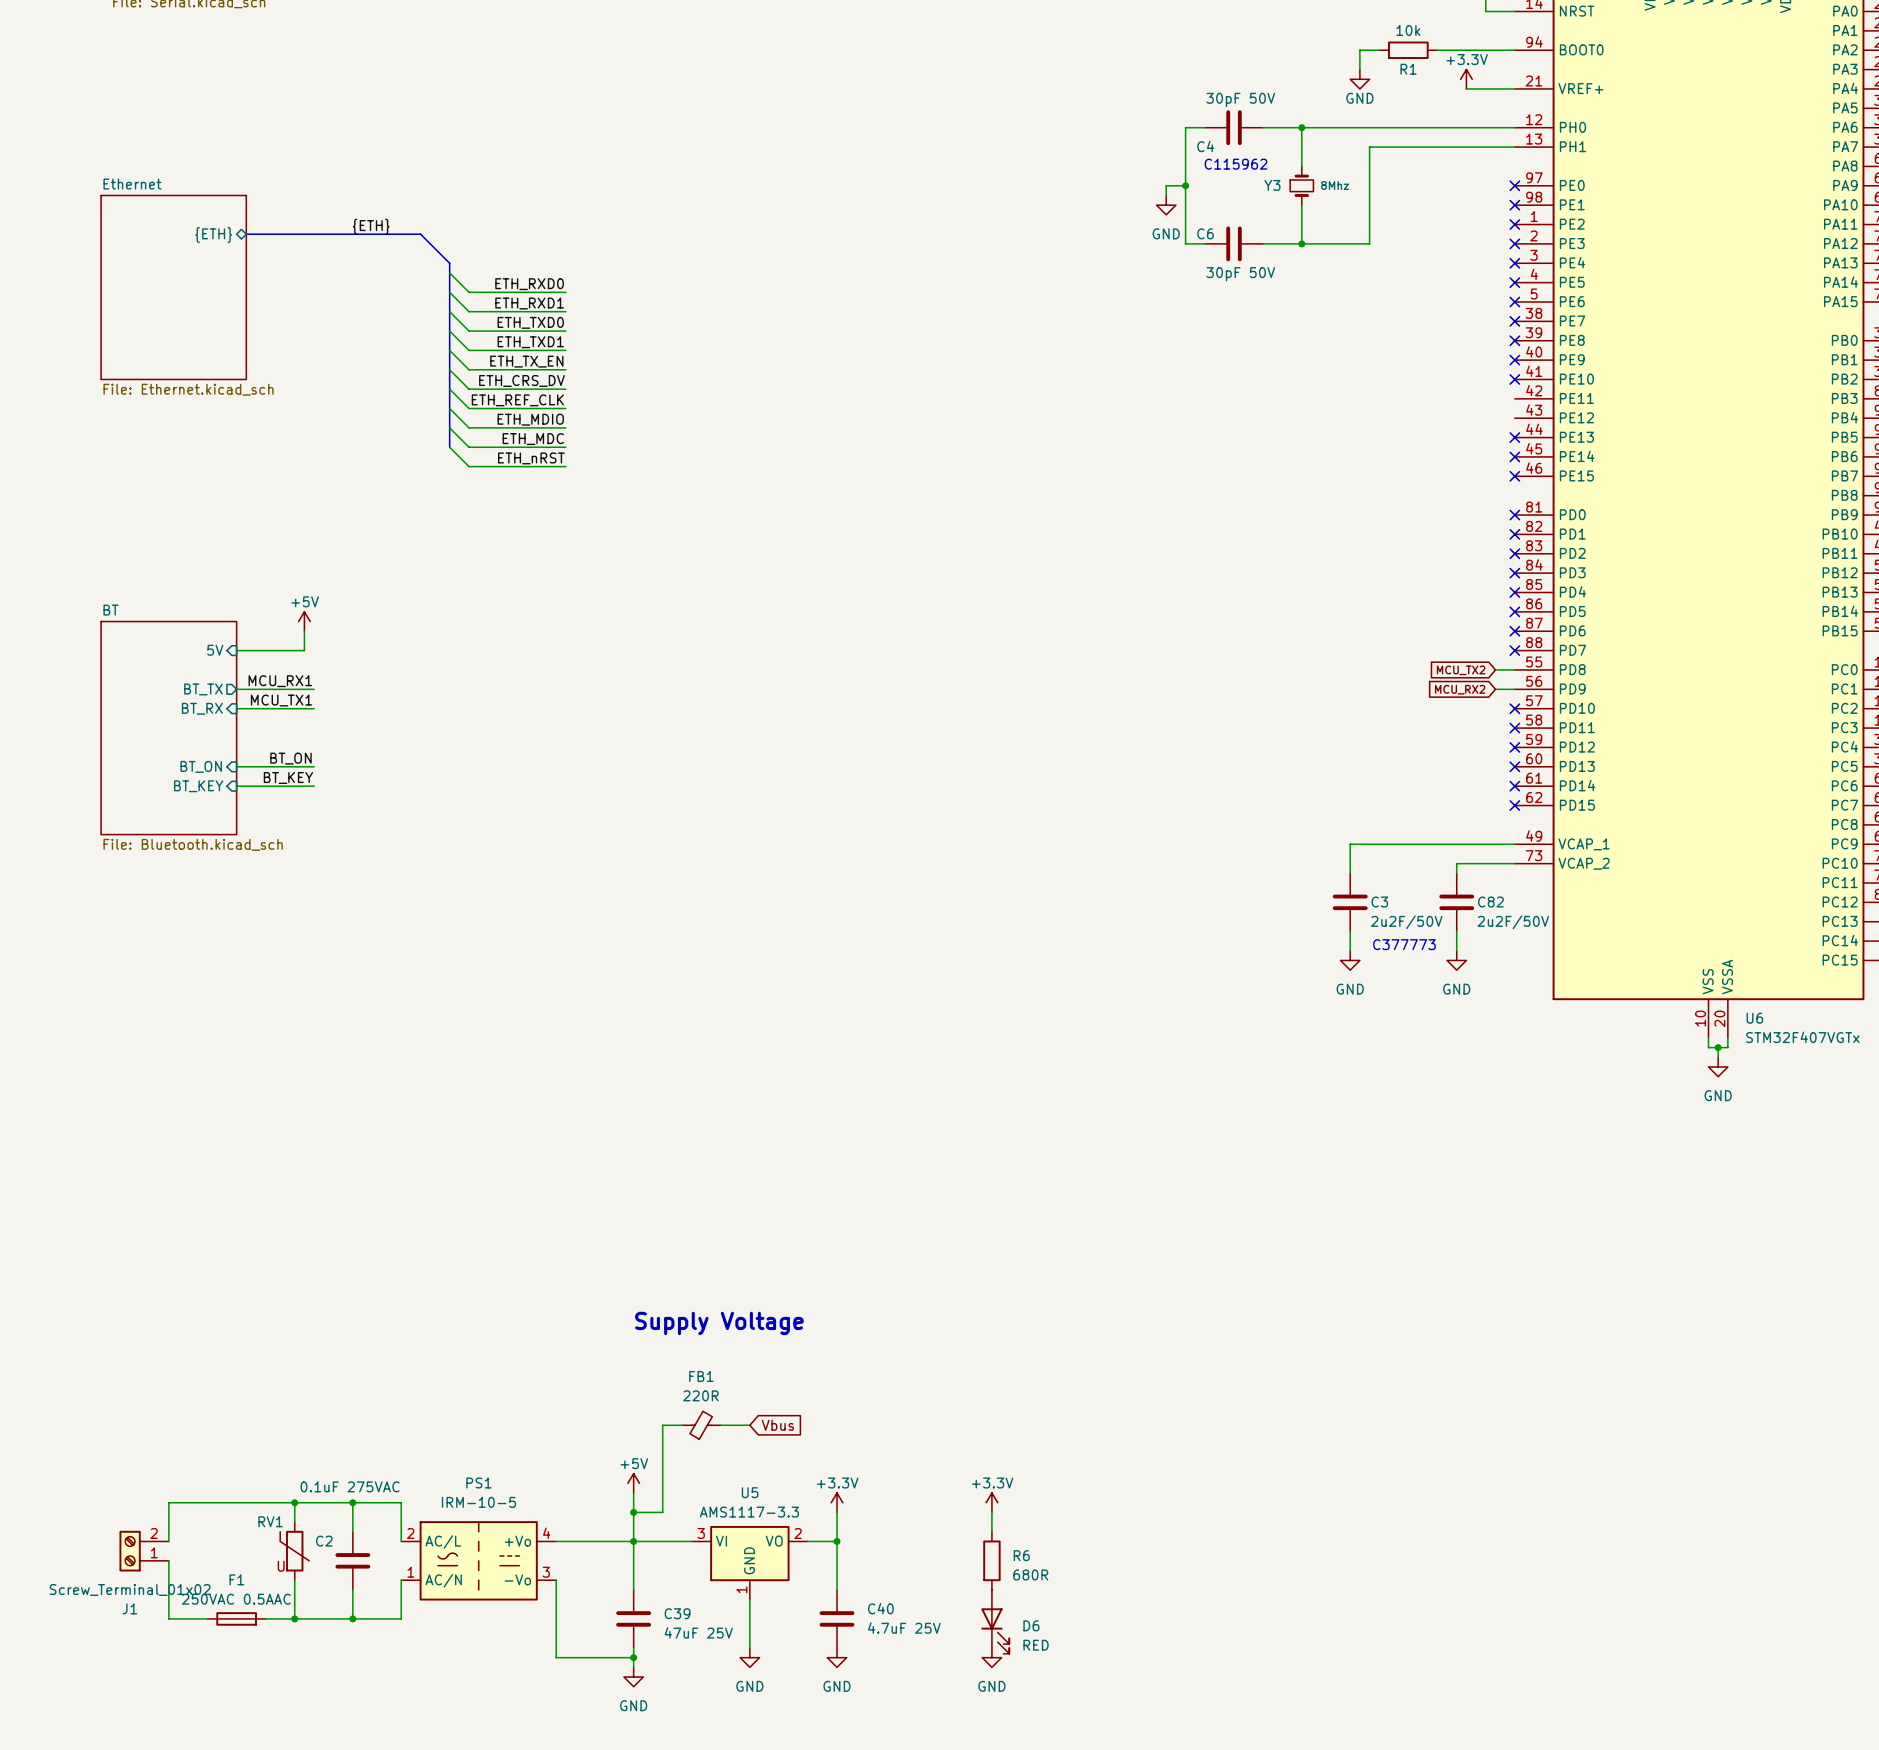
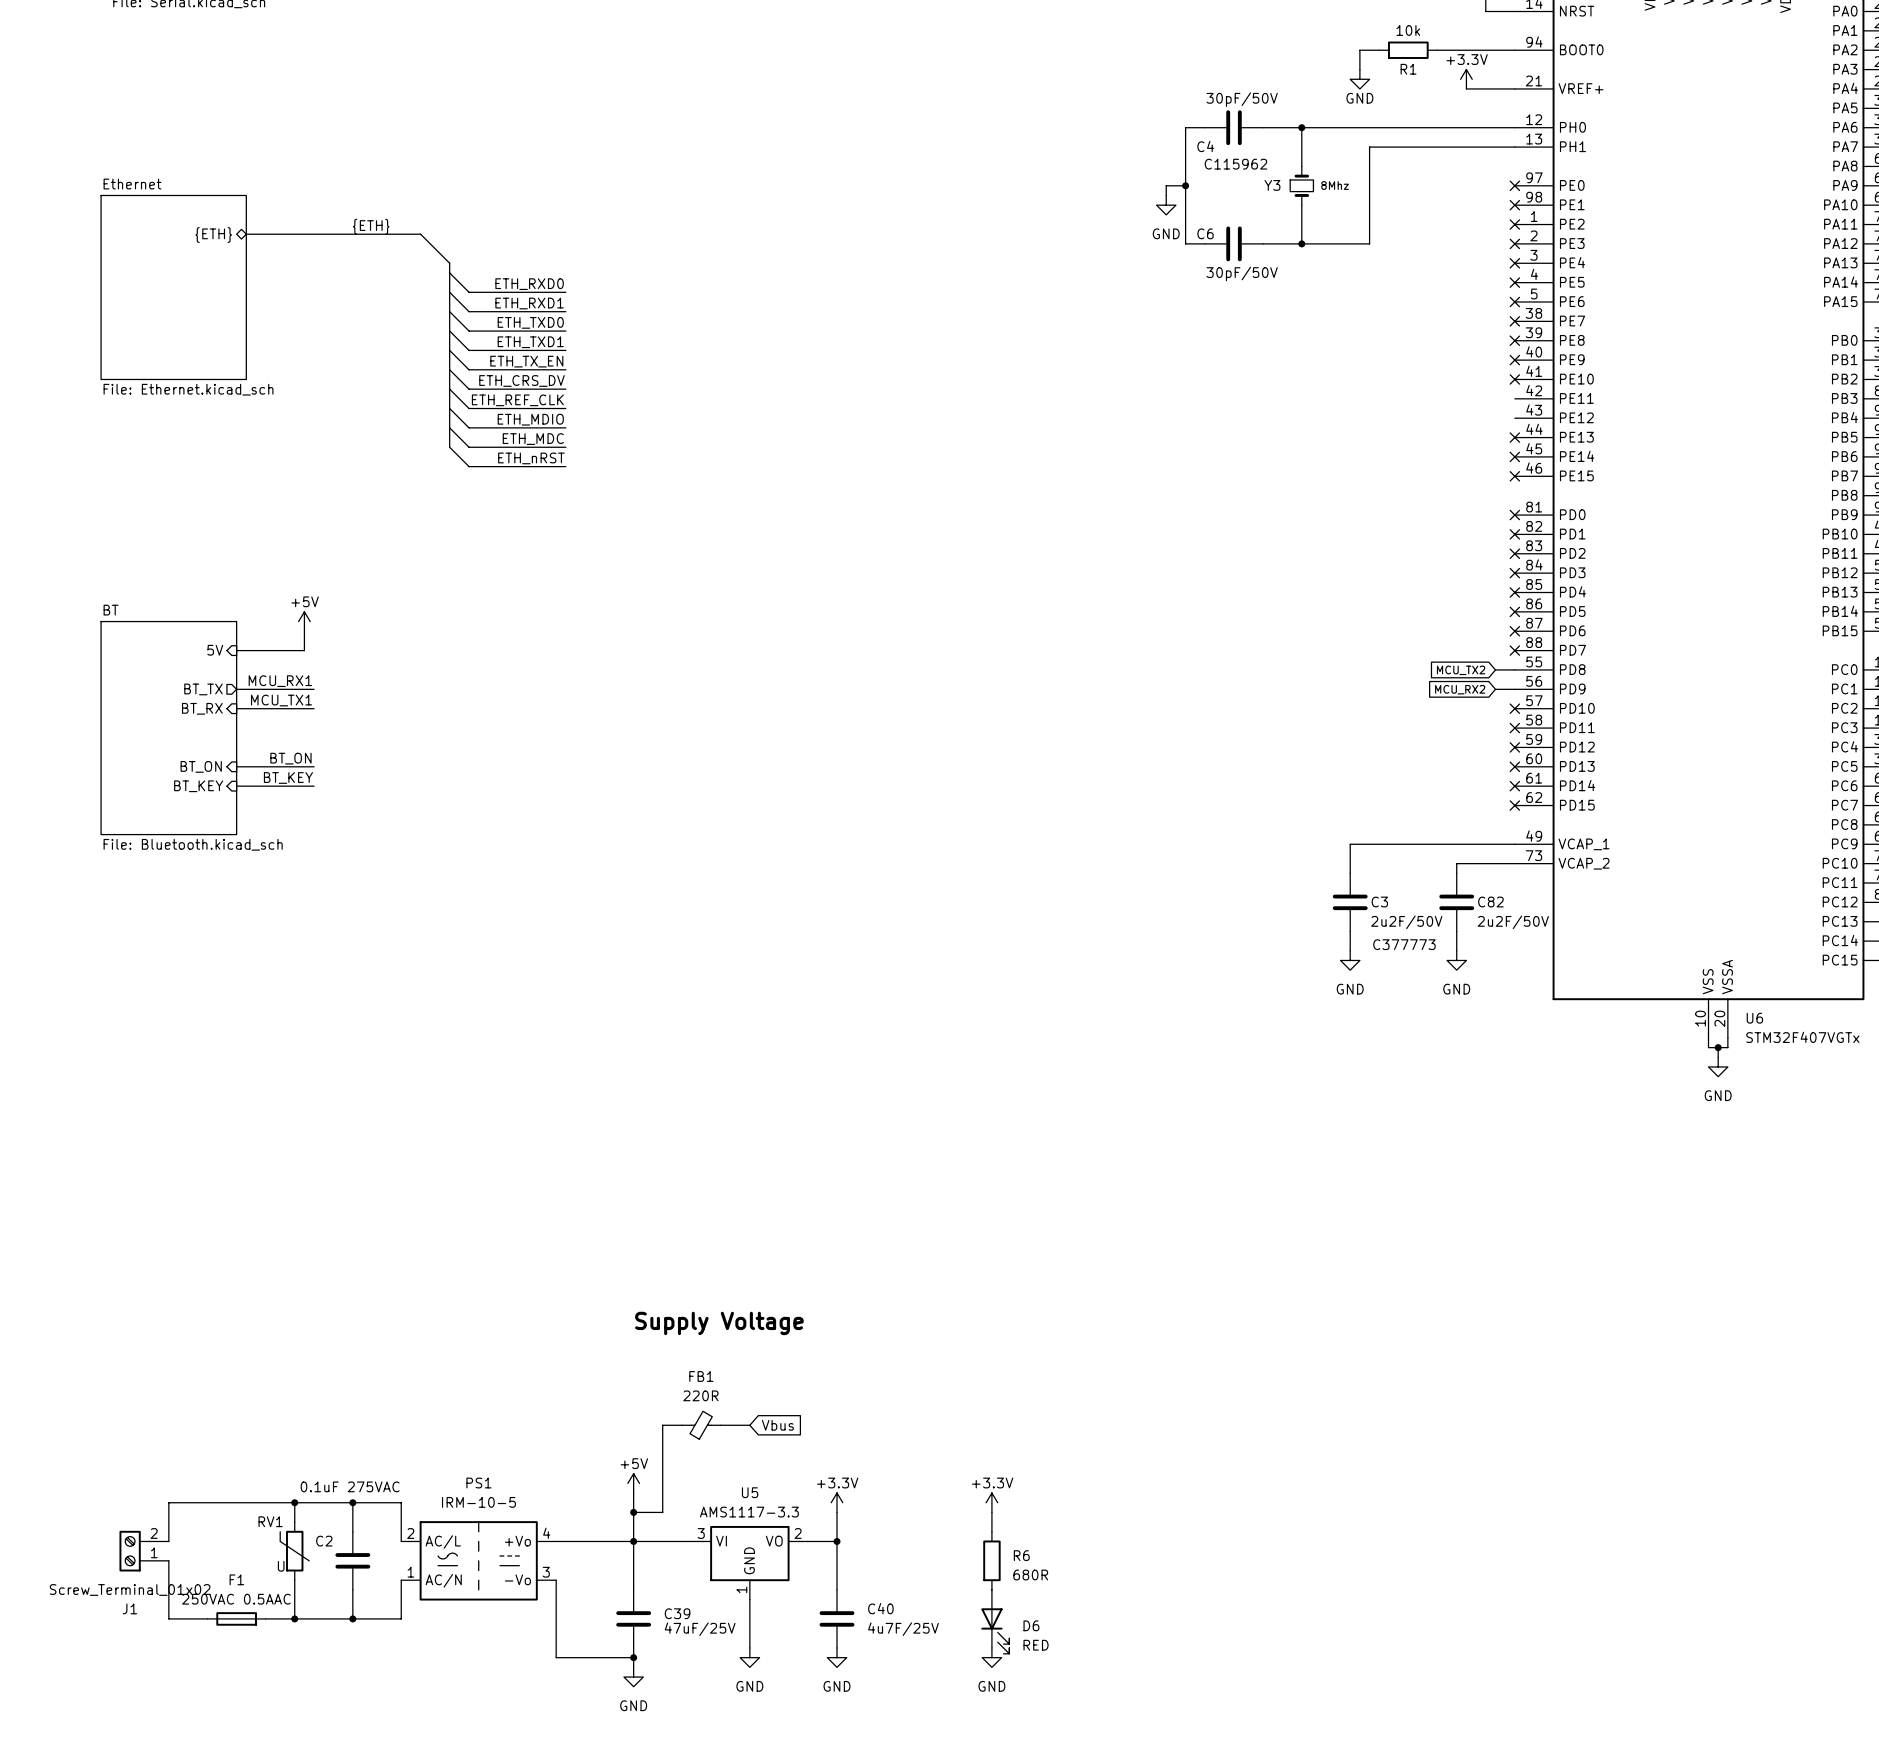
C4 value: 30pF 50V (1240, 99) -> 30pF/50V (1242, 99)
C6 value: 30pF 50V (1240, 274) -> 30pF/50V (1242, 273)
C40 value: 4.7uF 25V (904, 1628) -> 4u7F/25V (903, 1629)
C39 value: 47uF 25V (698, 1632) -> 47uF/25V (700, 1629)

